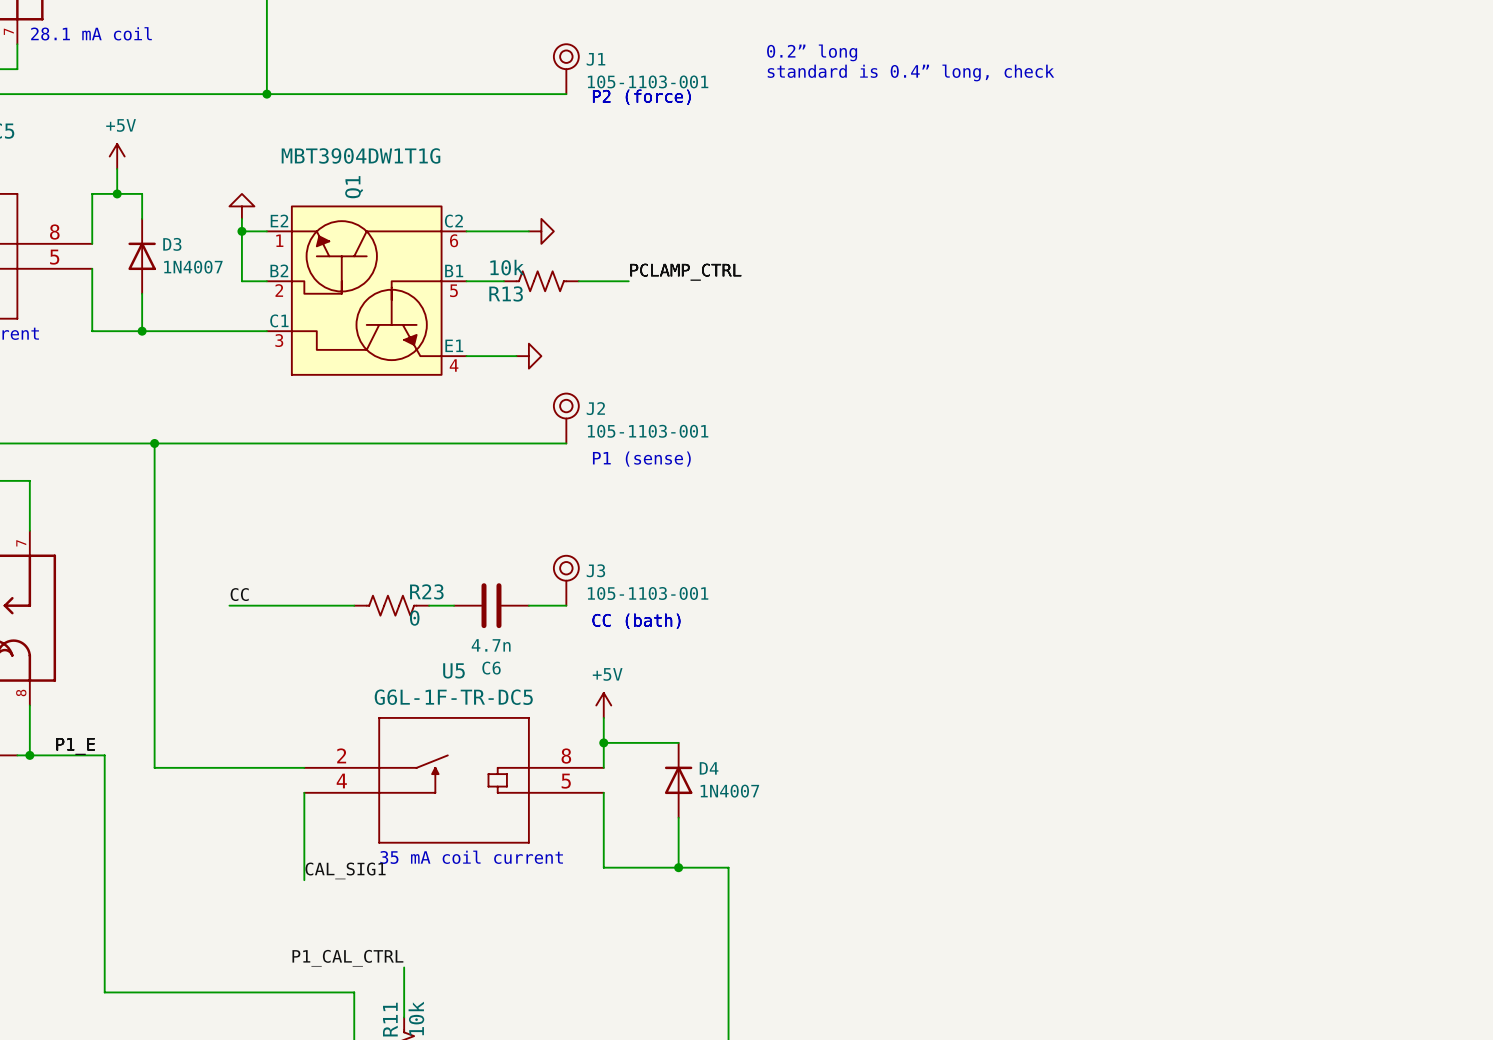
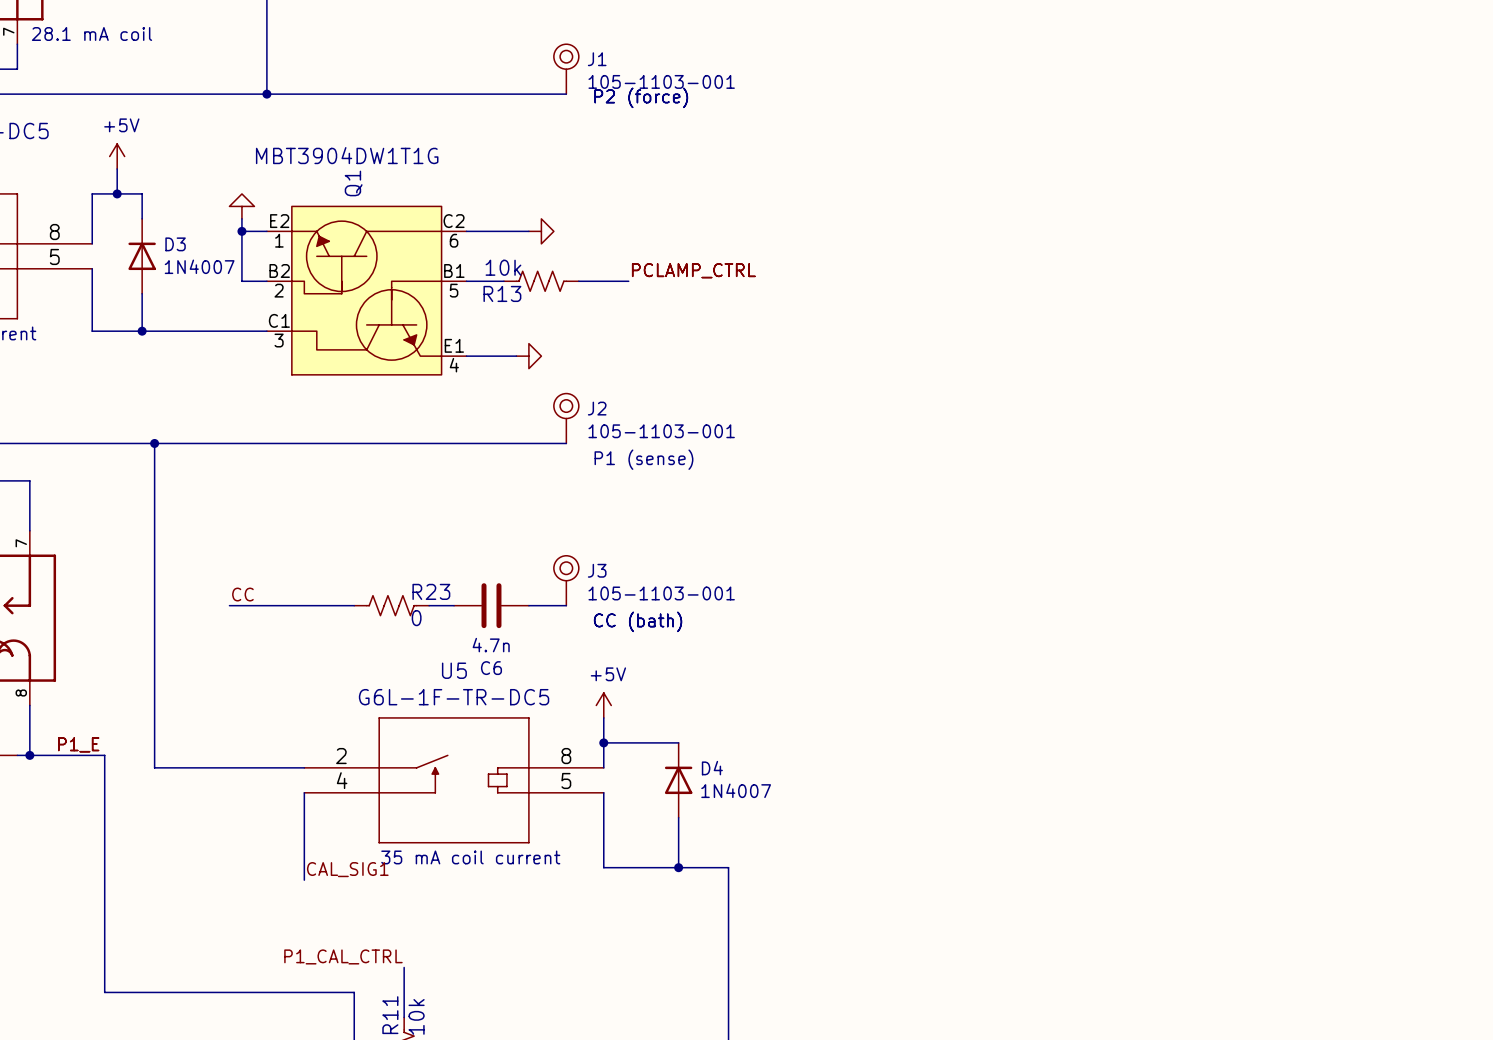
text: 0.2” long (812, 52) -> none
text: standard is 0.4” long, check (910, 72) -> none

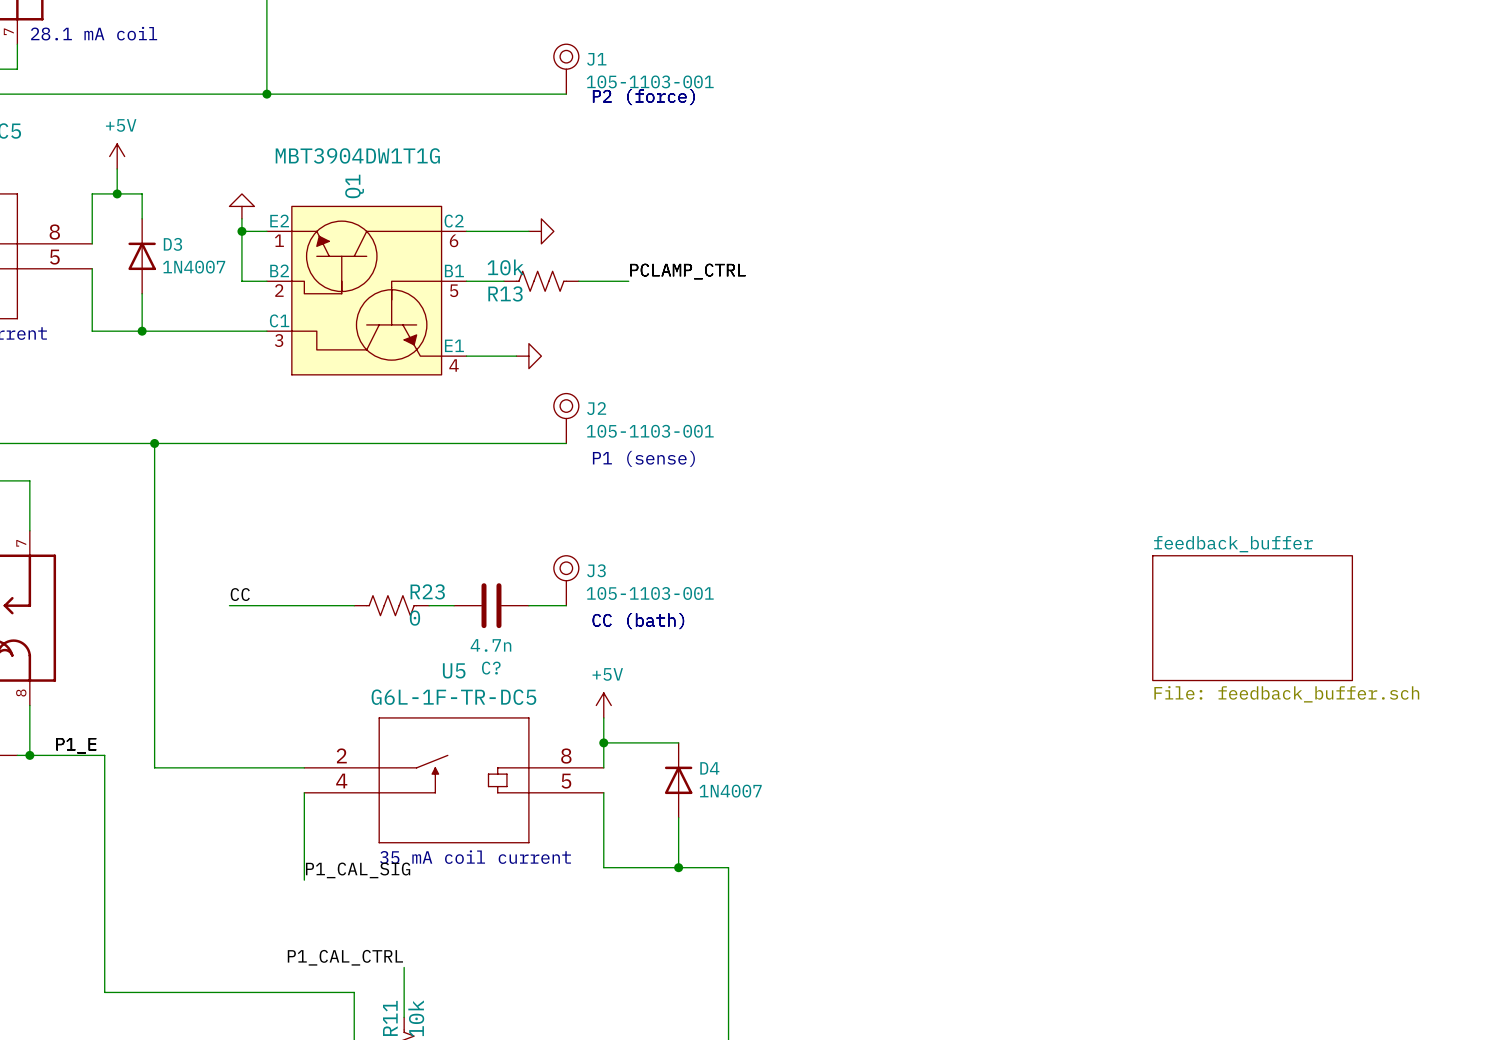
sheet feedback_buffer: none -> File: feedback_buffer.sch (1252, 618)
C6 name: C6 (491, 668) -> C? (491, 668)
label: CAL_SIG1 (347, 869) -> P1_CAL_SIG (358, 870)

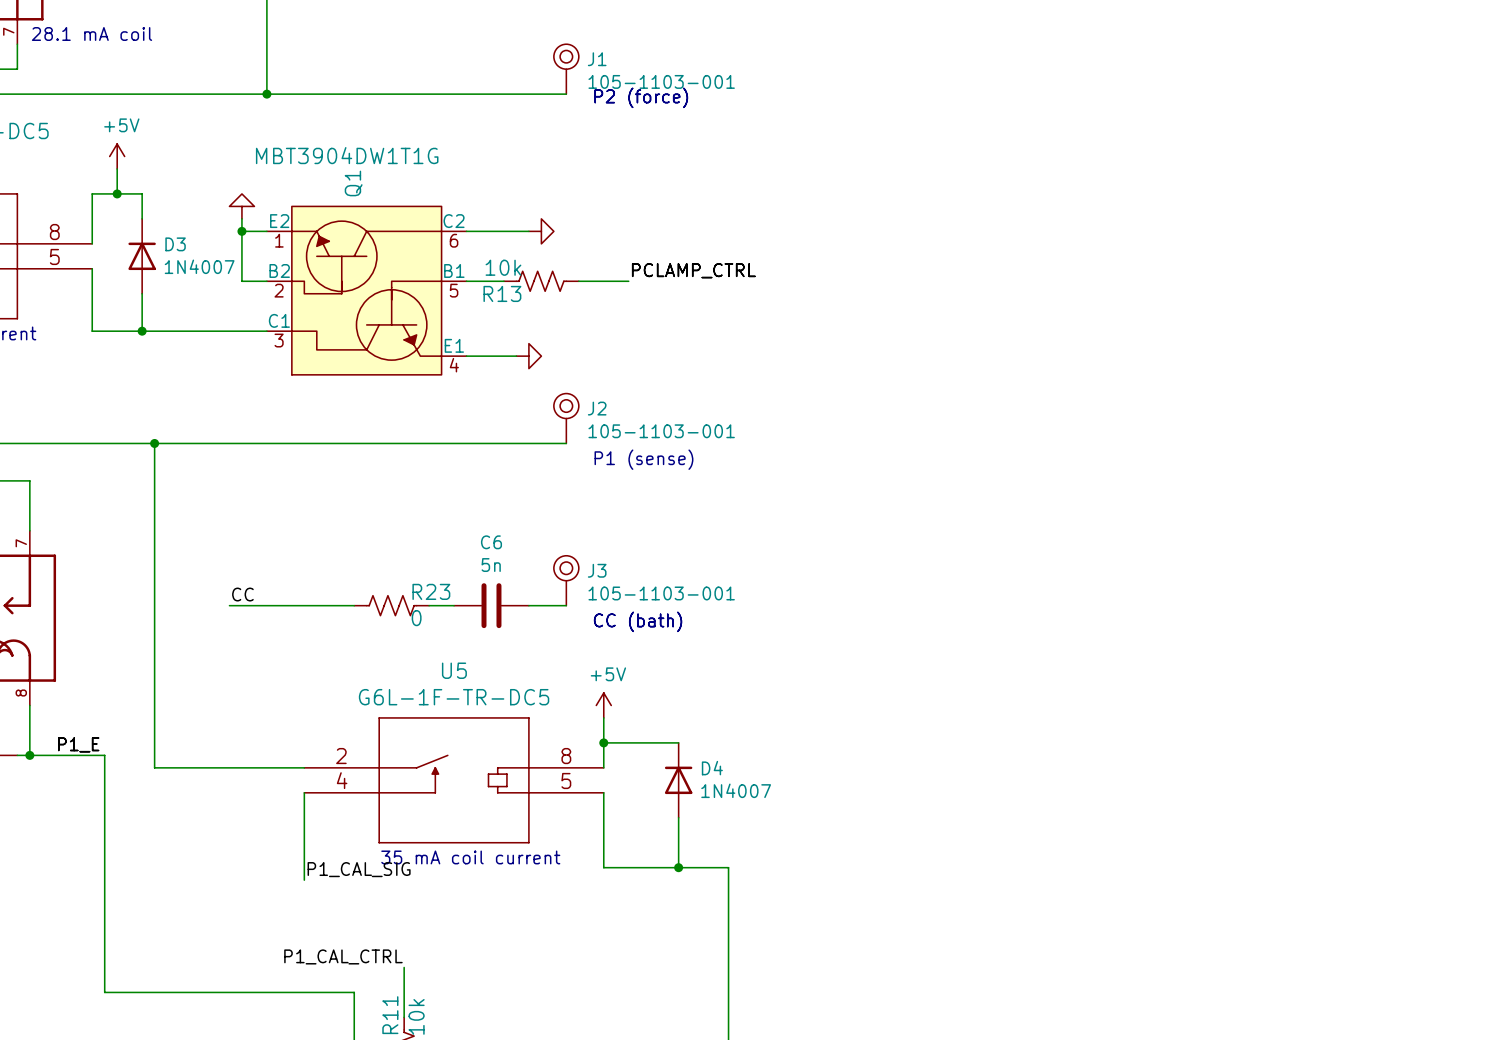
sheet feedback_buffer: File: feedback_buffer.sch (1252, 618) -> none
C? value: 4.7n (490, 645) -> 5n (491, 565)
C? name: C? (491, 668) -> C6 (491, 542)

